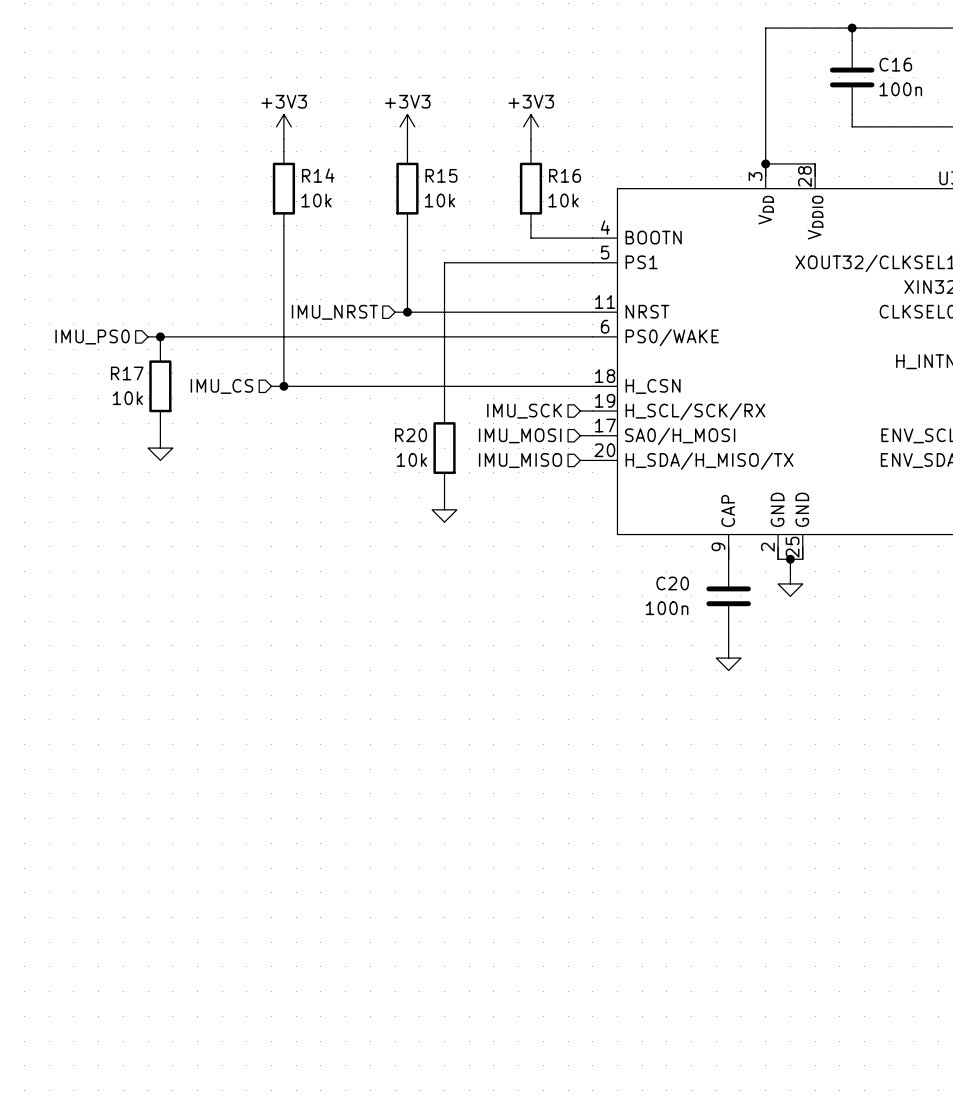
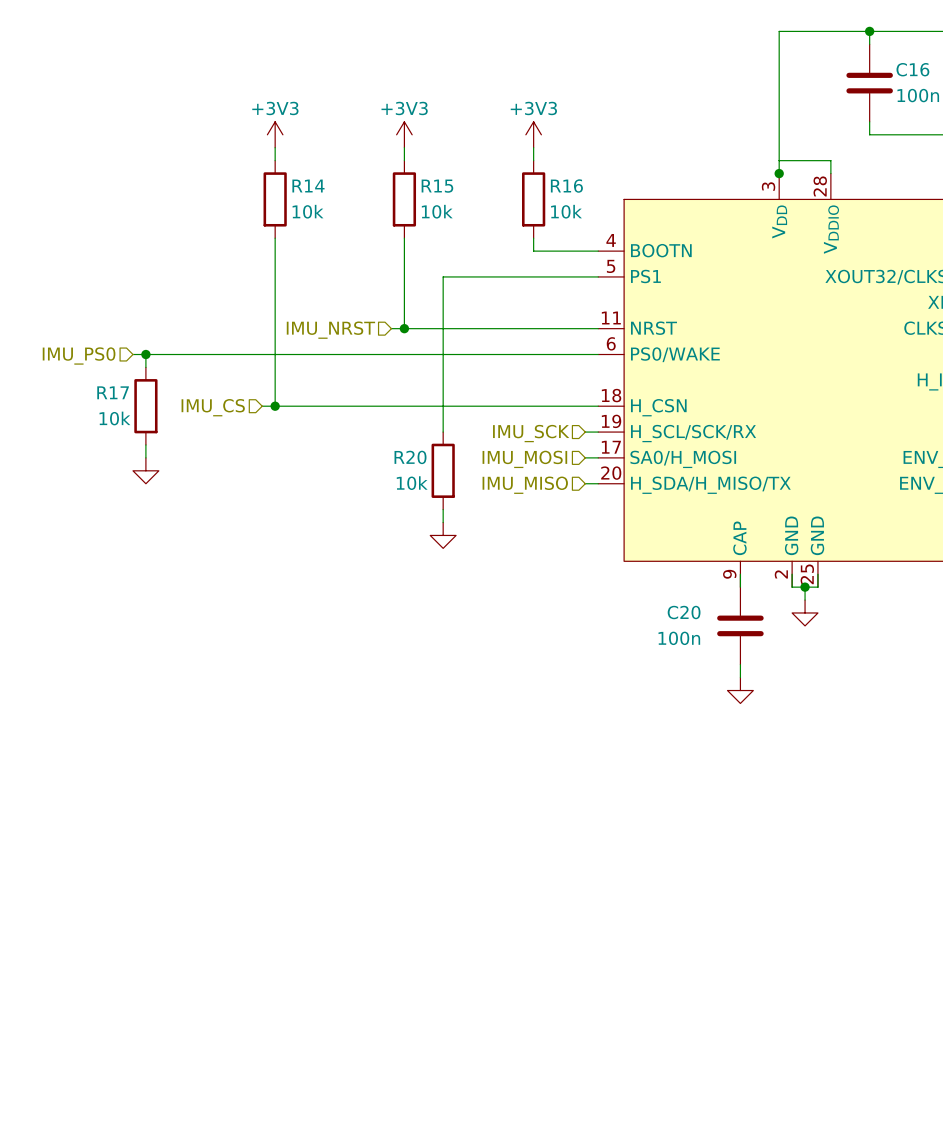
wire: none -> (779, 160) (830, 160) (830, 173)
wire: (765, 176) (765, 163) (815, 163) (815, 176) -> none

